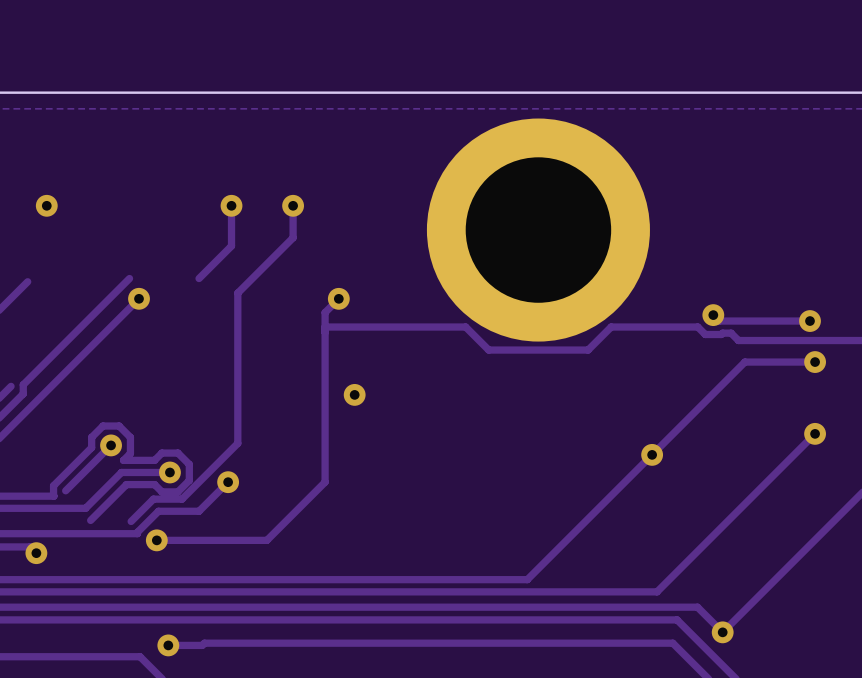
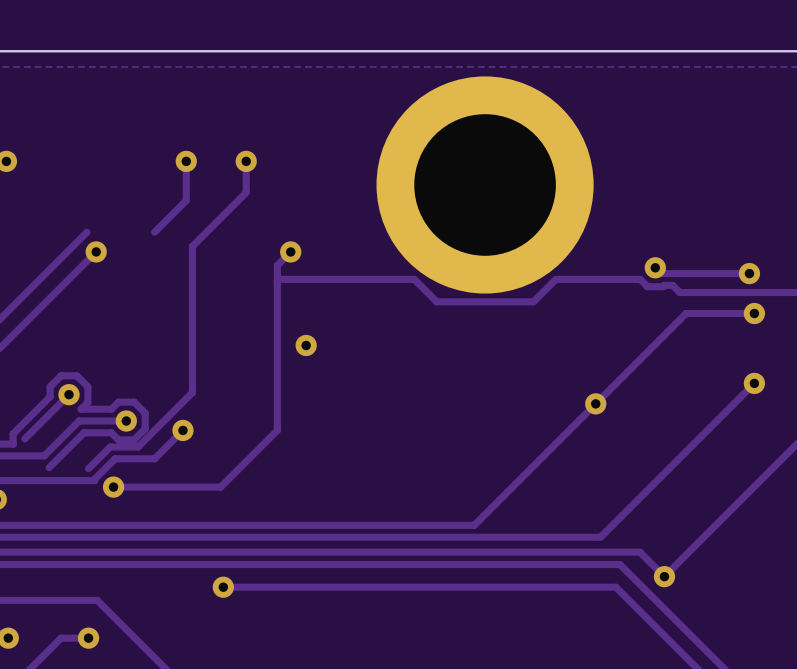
track: (269, 643) (168, 645) -> none
via position: (168, 645) -> (223, 587)

